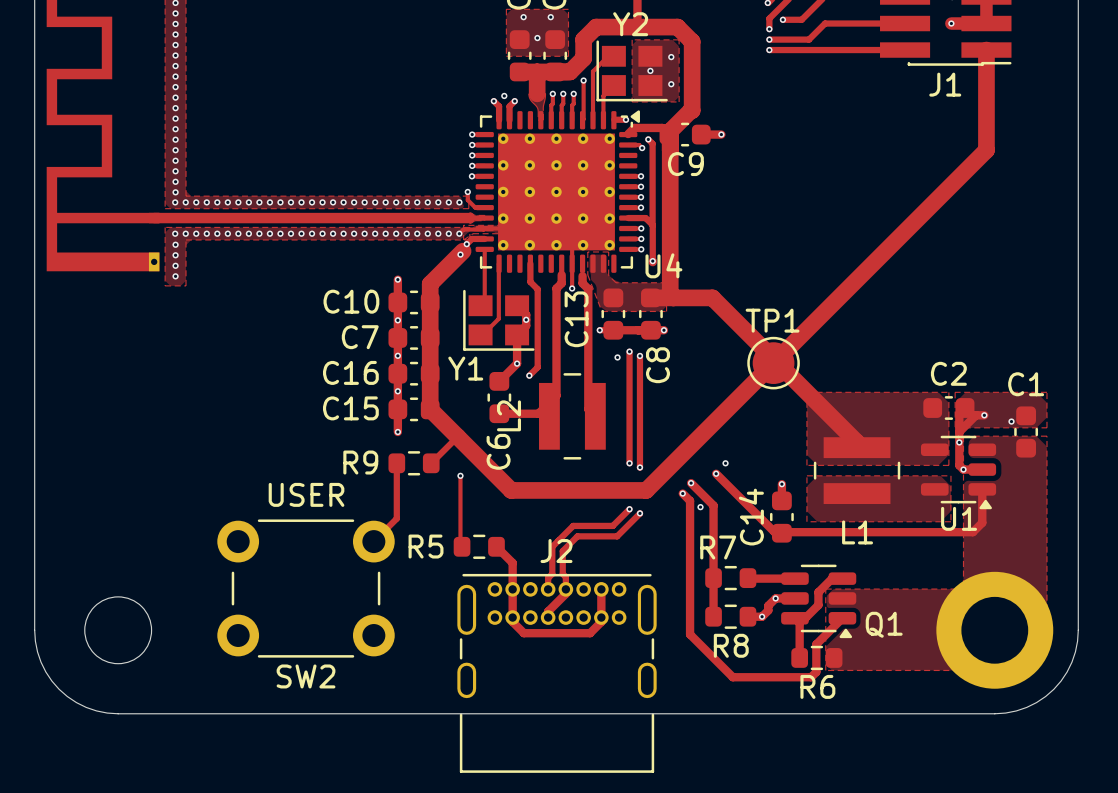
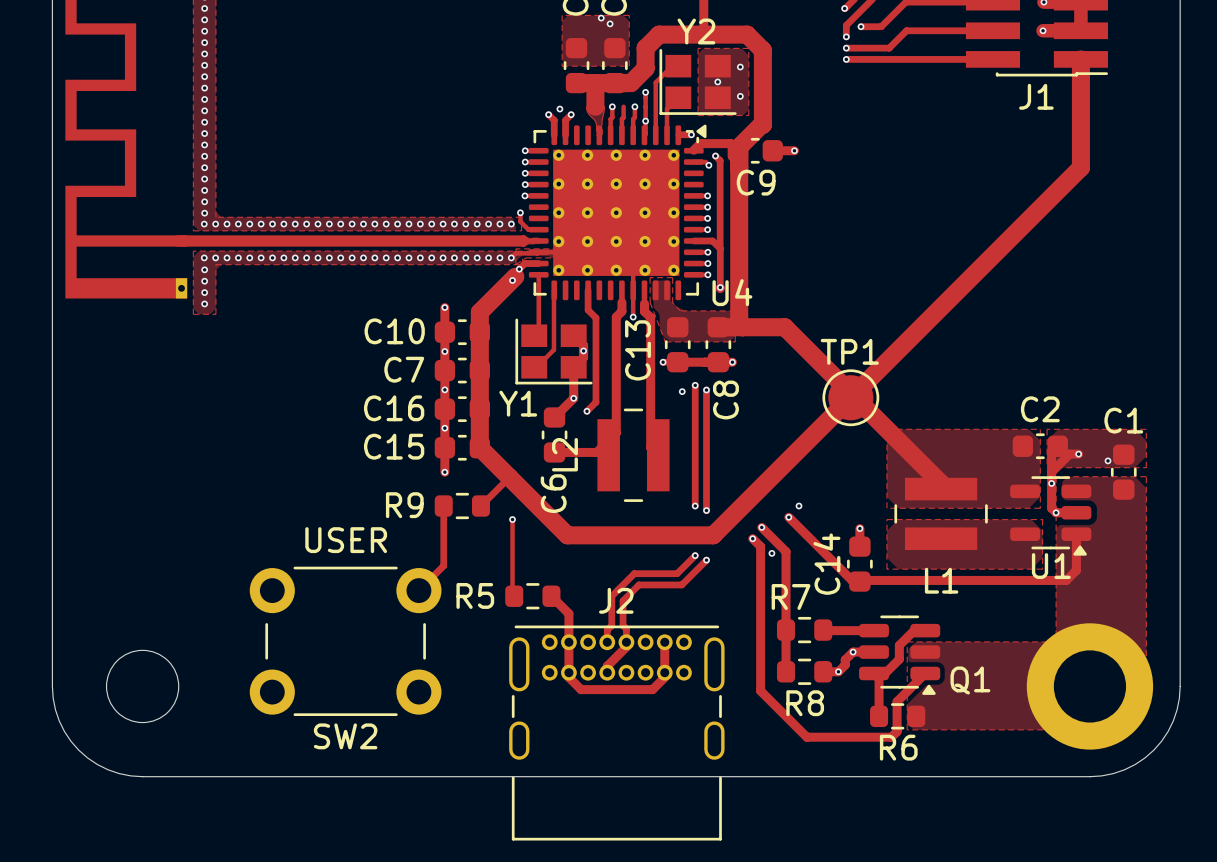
via: none -> (601, 18)
via: (523, 17) -> none
via: (537, 38) -> none
via position: (563, 93) -> (645, 121)

